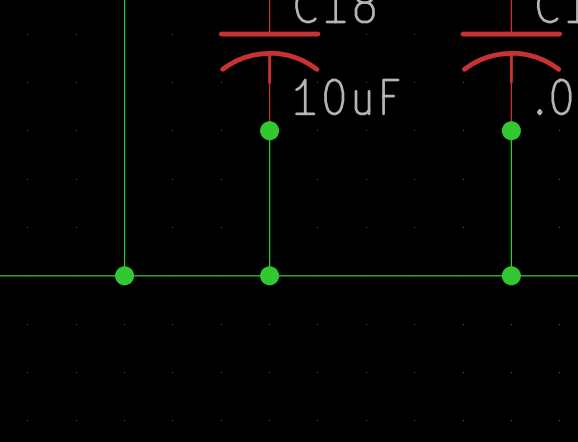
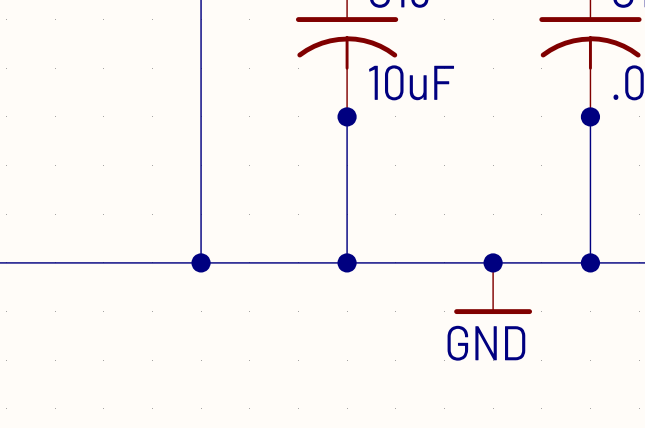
junction: none -> (493, 262)
power symbol: none -> GND (493, 288)

